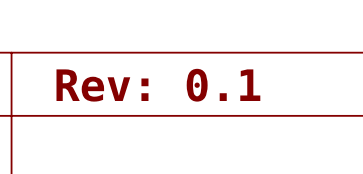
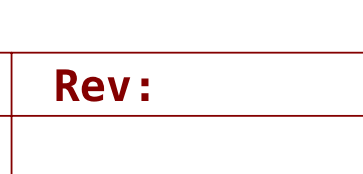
title block: Rev: 0.1 (158, 85) -> Rev: (102, 85)

